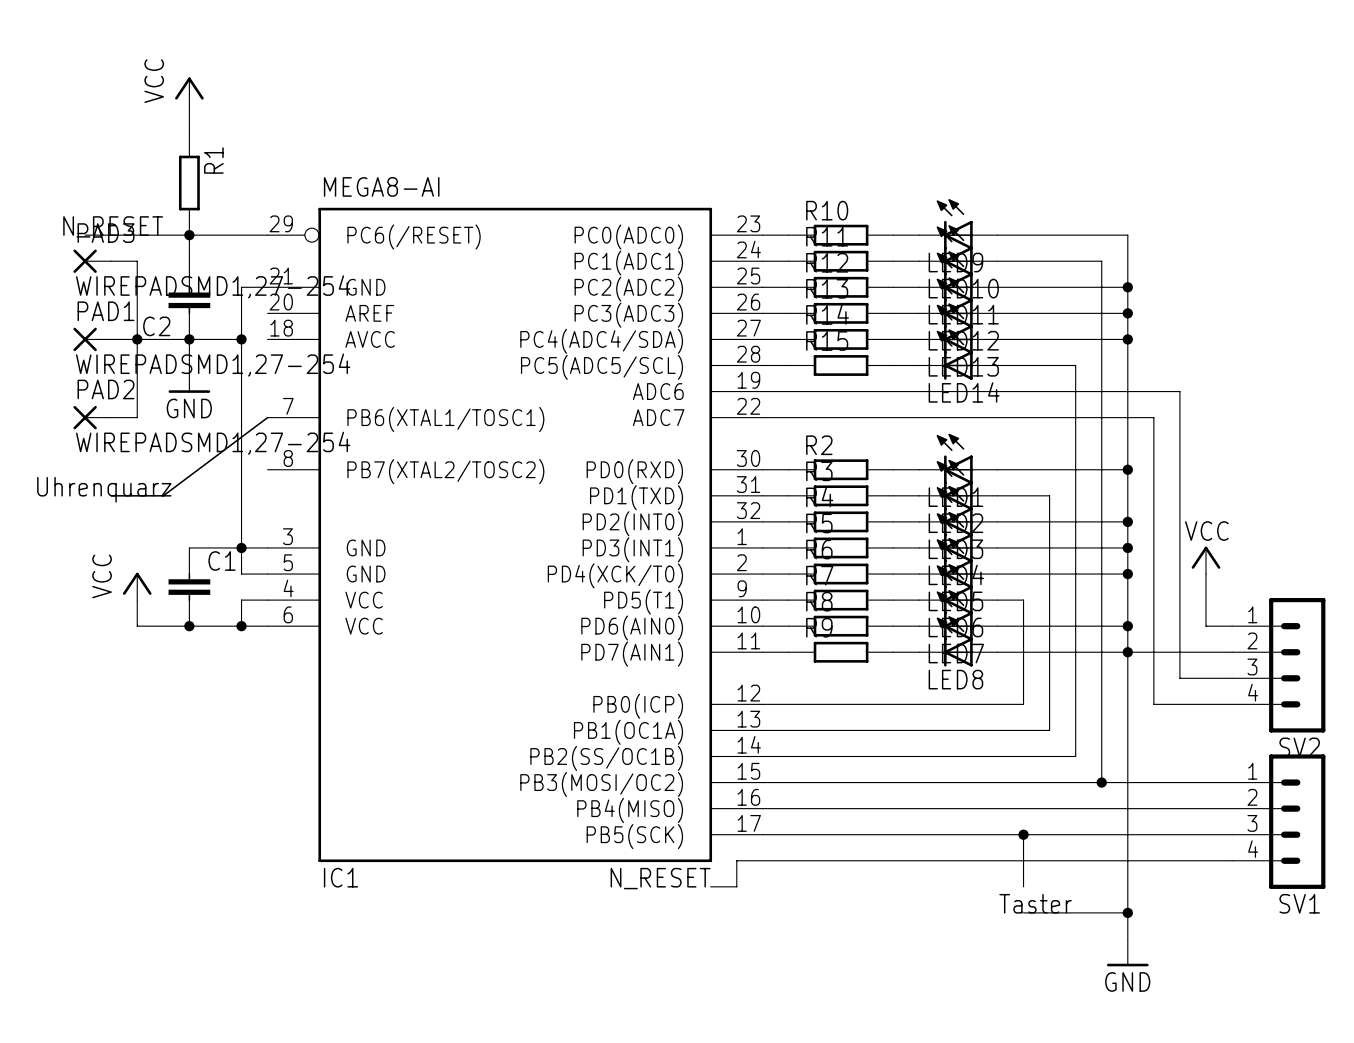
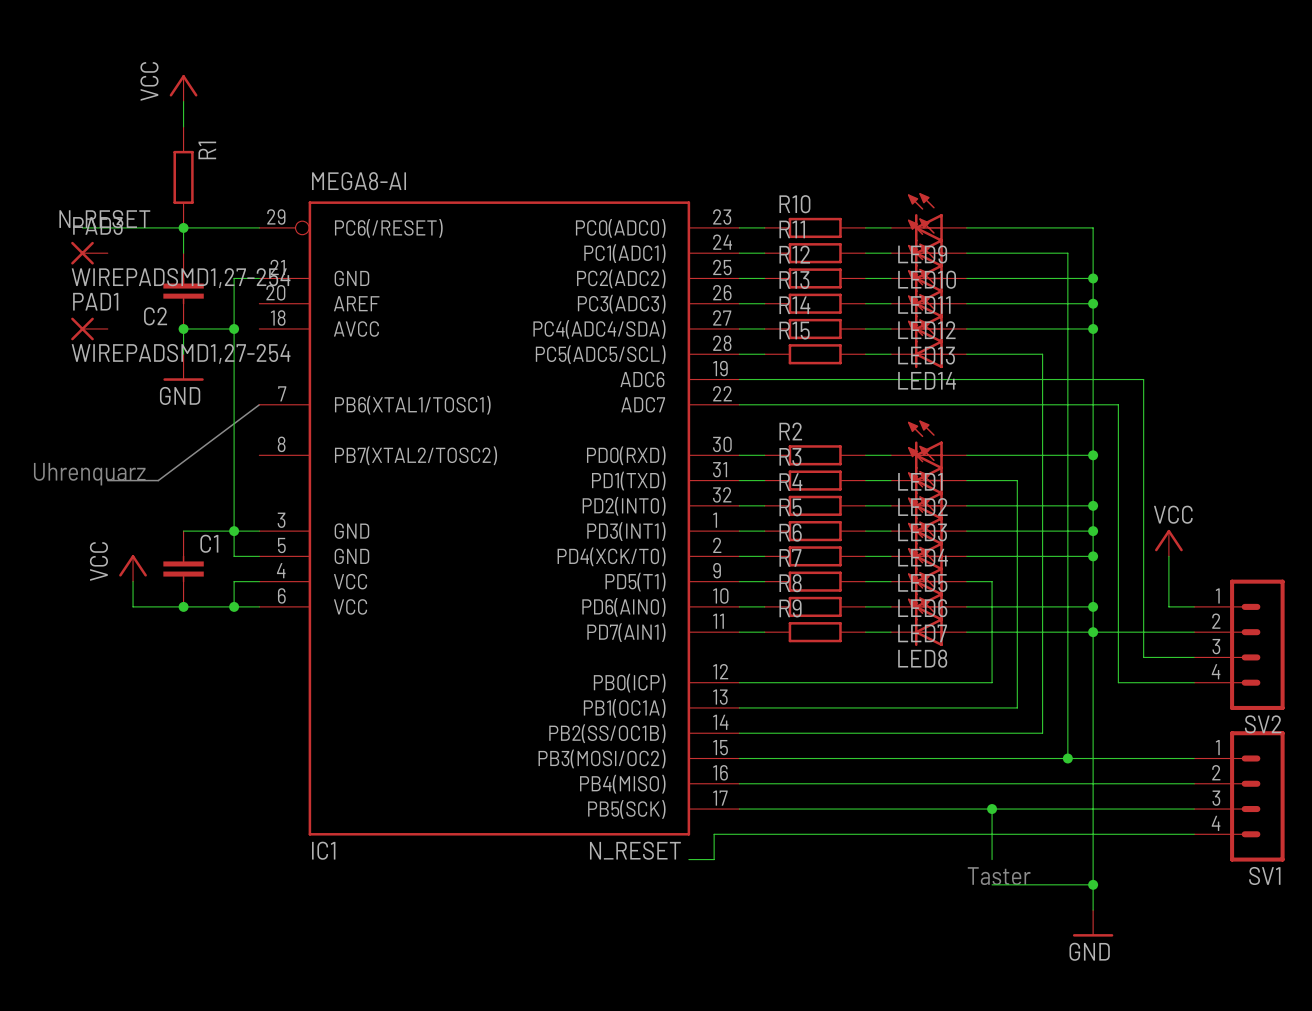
wire: (111, 261) (137, 261) (137, 417) (111, 417) -> none
wire: (111, 339) (189, 339) -> none
junction: (137, 339) -> none
PAD2: WIREPADSMD1,27-254 (92, 417) -> none

